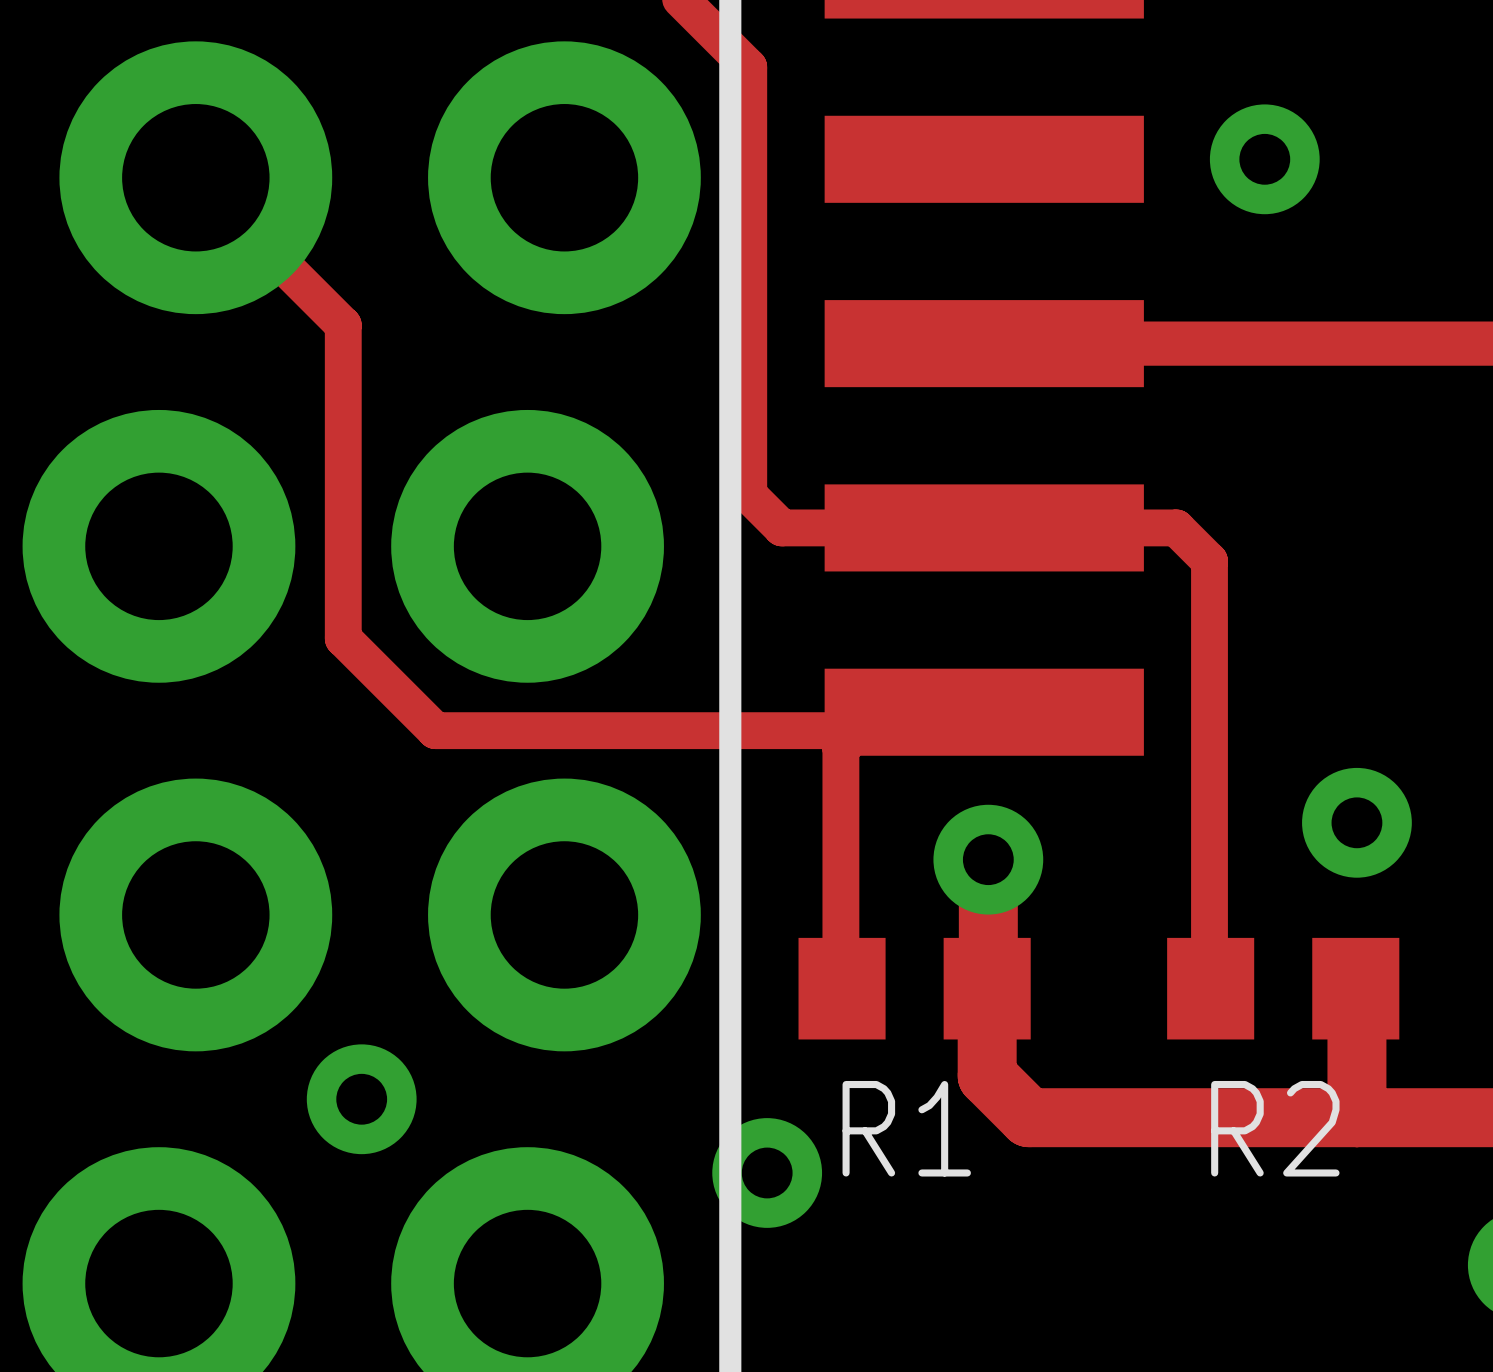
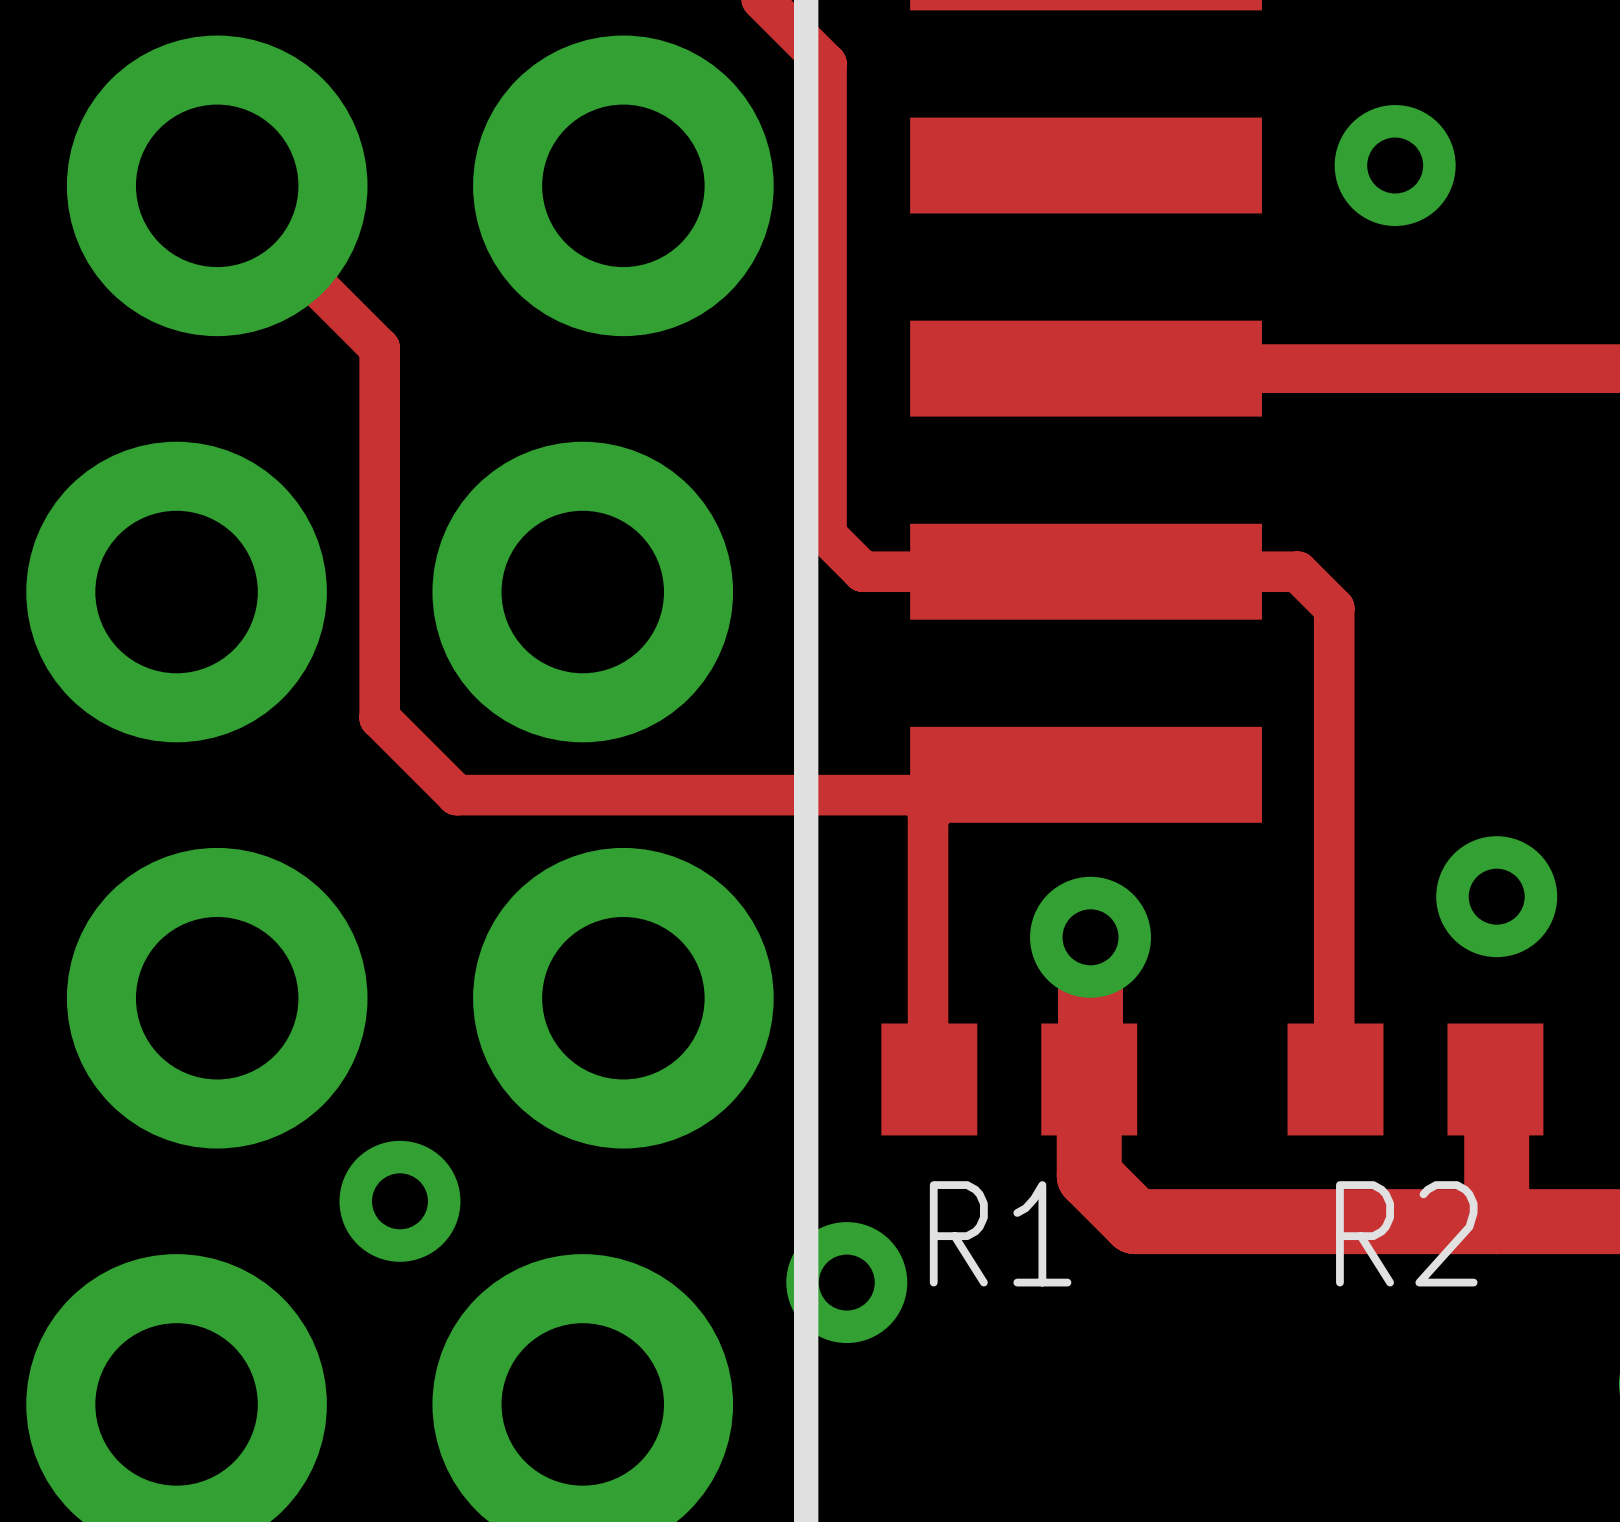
track: (343, 638) (435, 730) -> (379, 693) (379, 717) (456, 795) (481, 795)

